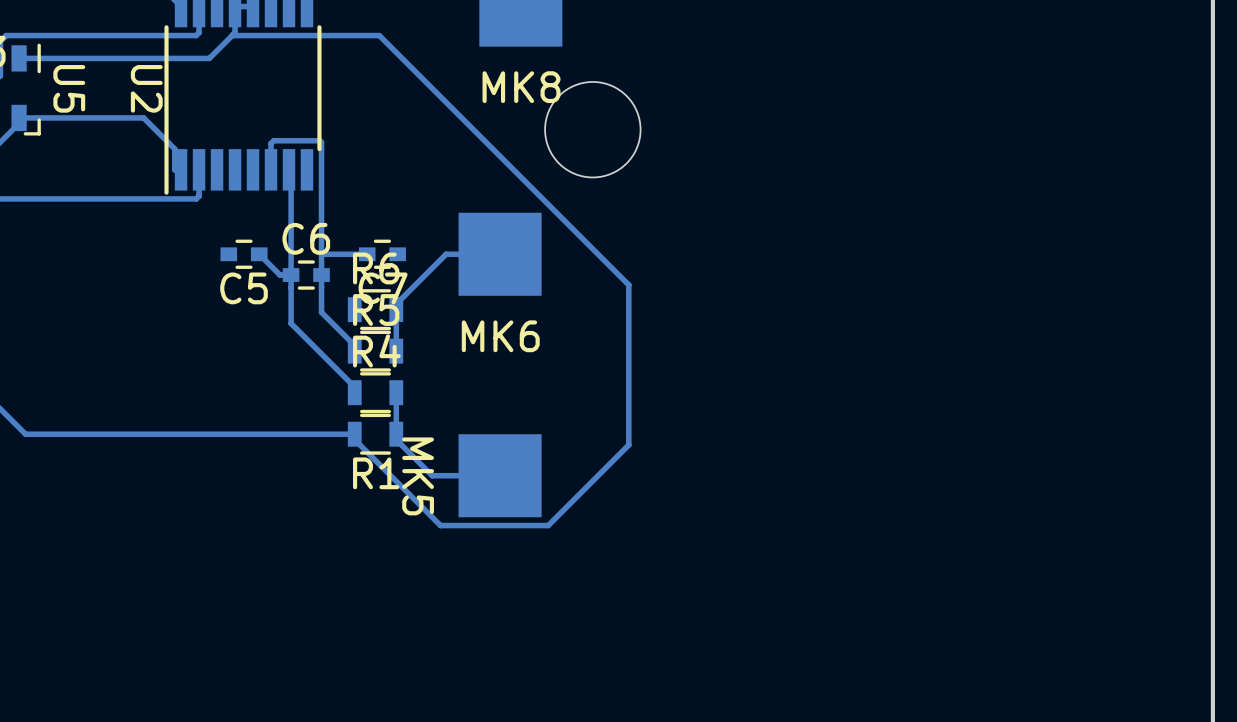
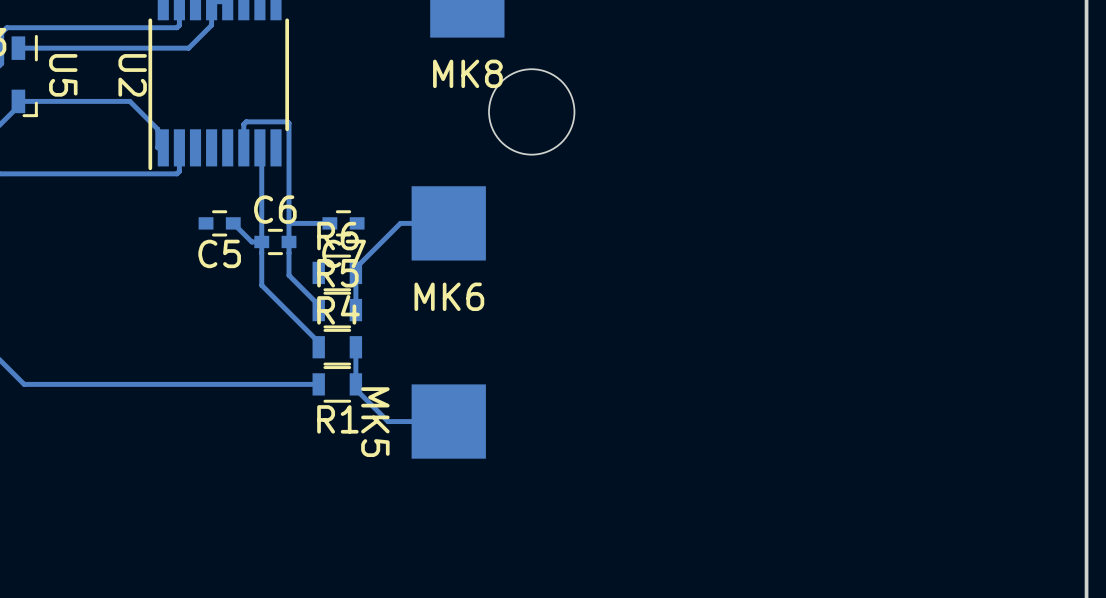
track: (232, 35) (379, 35) (628, 285) (628, 445) (548, 525) (440, 525) (354, 439) (354, 434) -> none

